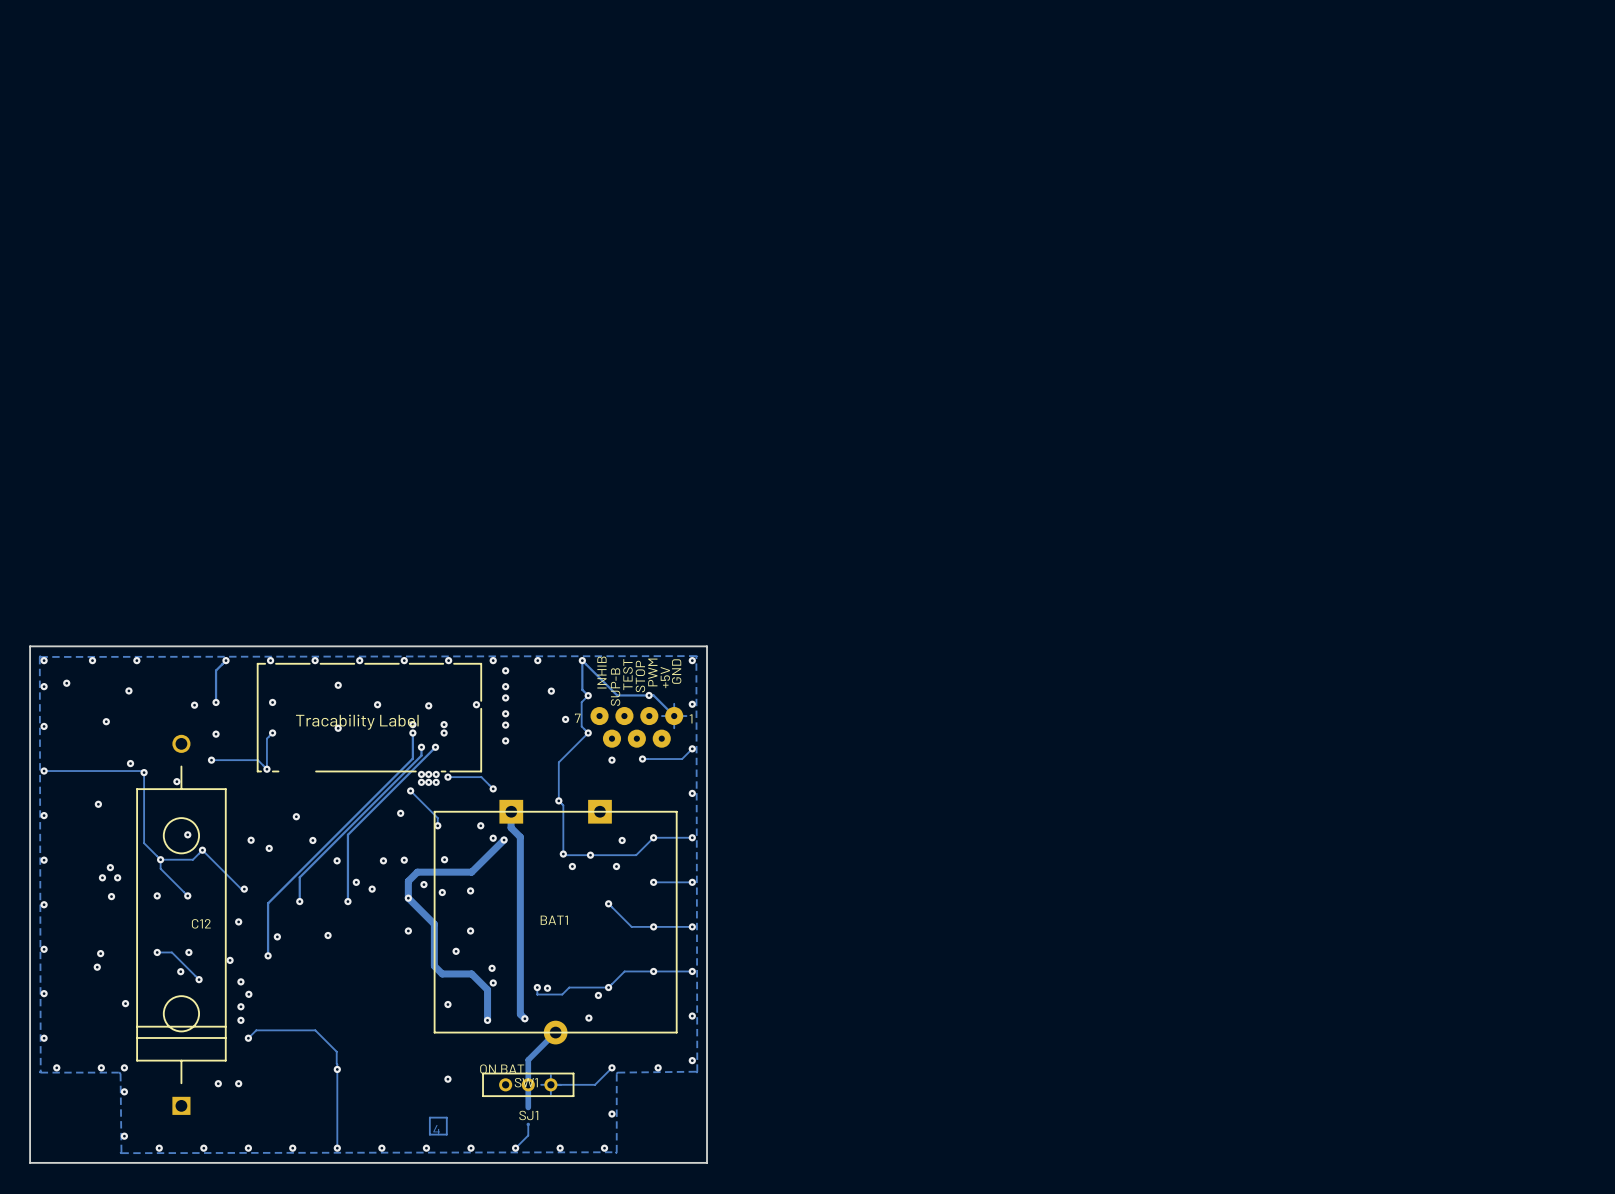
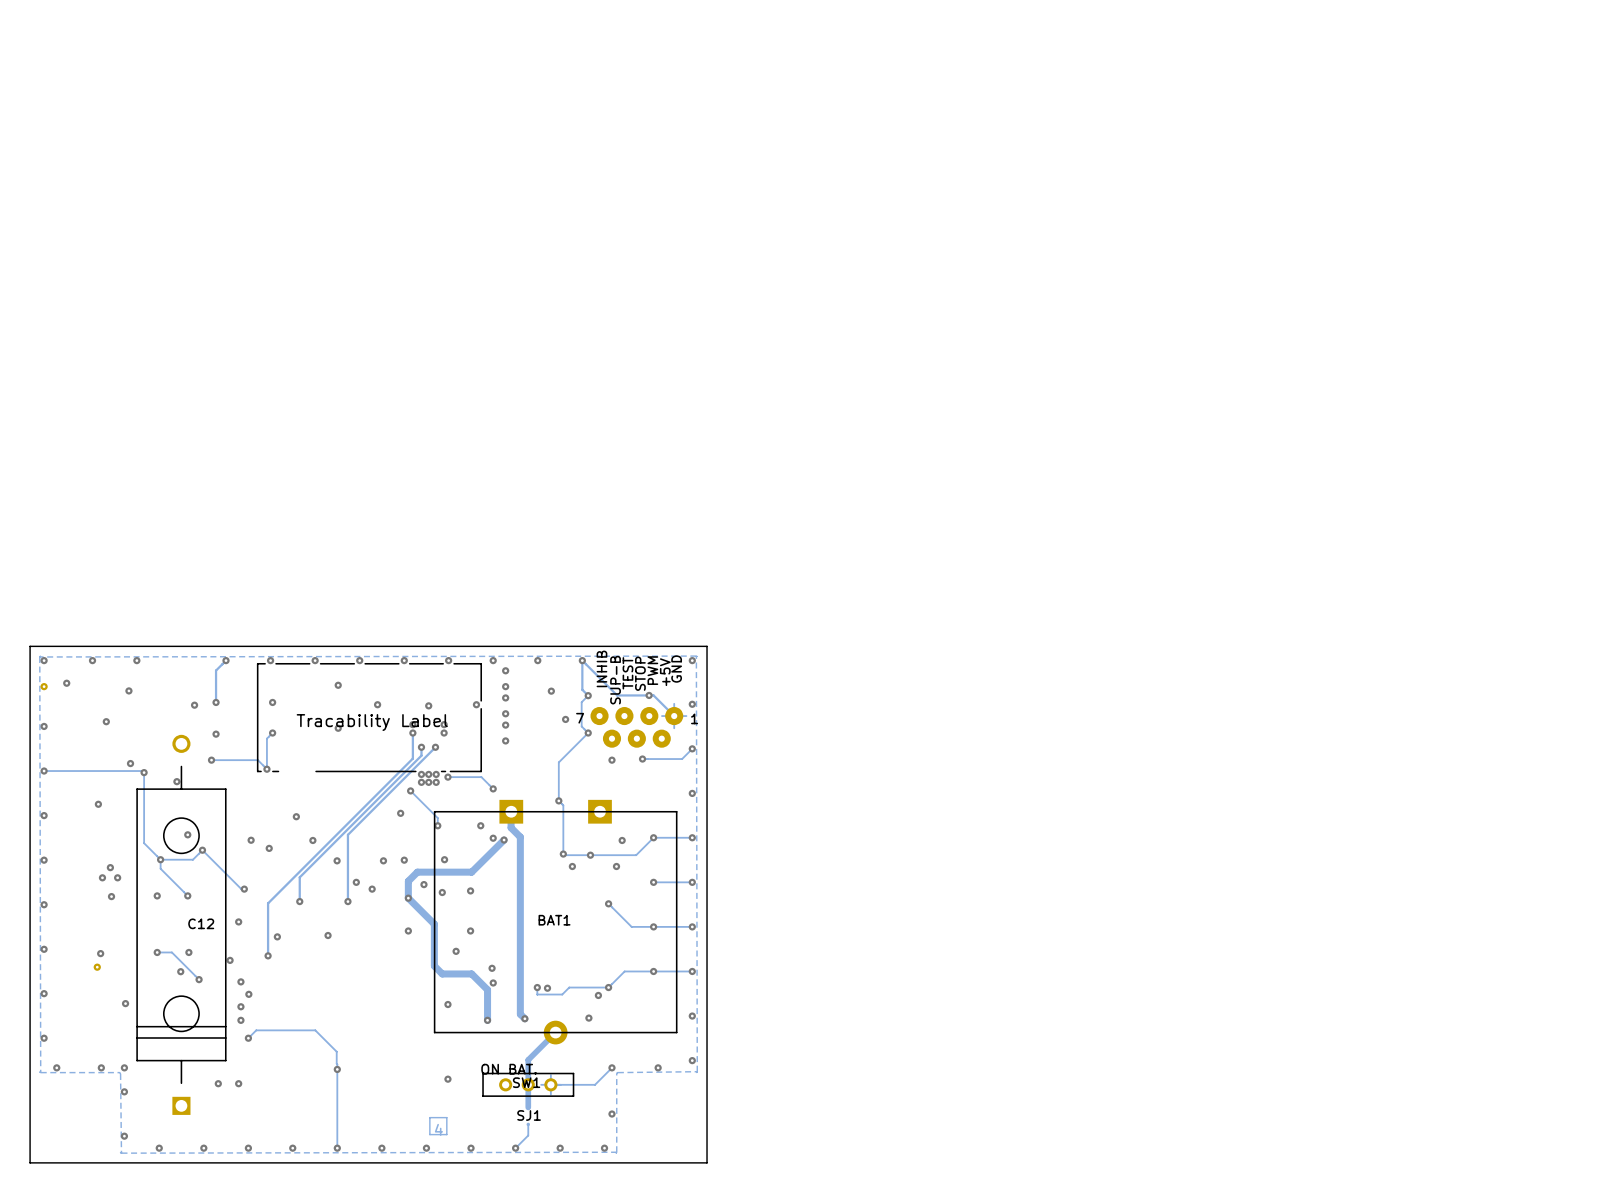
via: (44, 686) -> none
part: none -> (44, 686)
via: (97, 967) -> none
part: none -> (97, 967)

